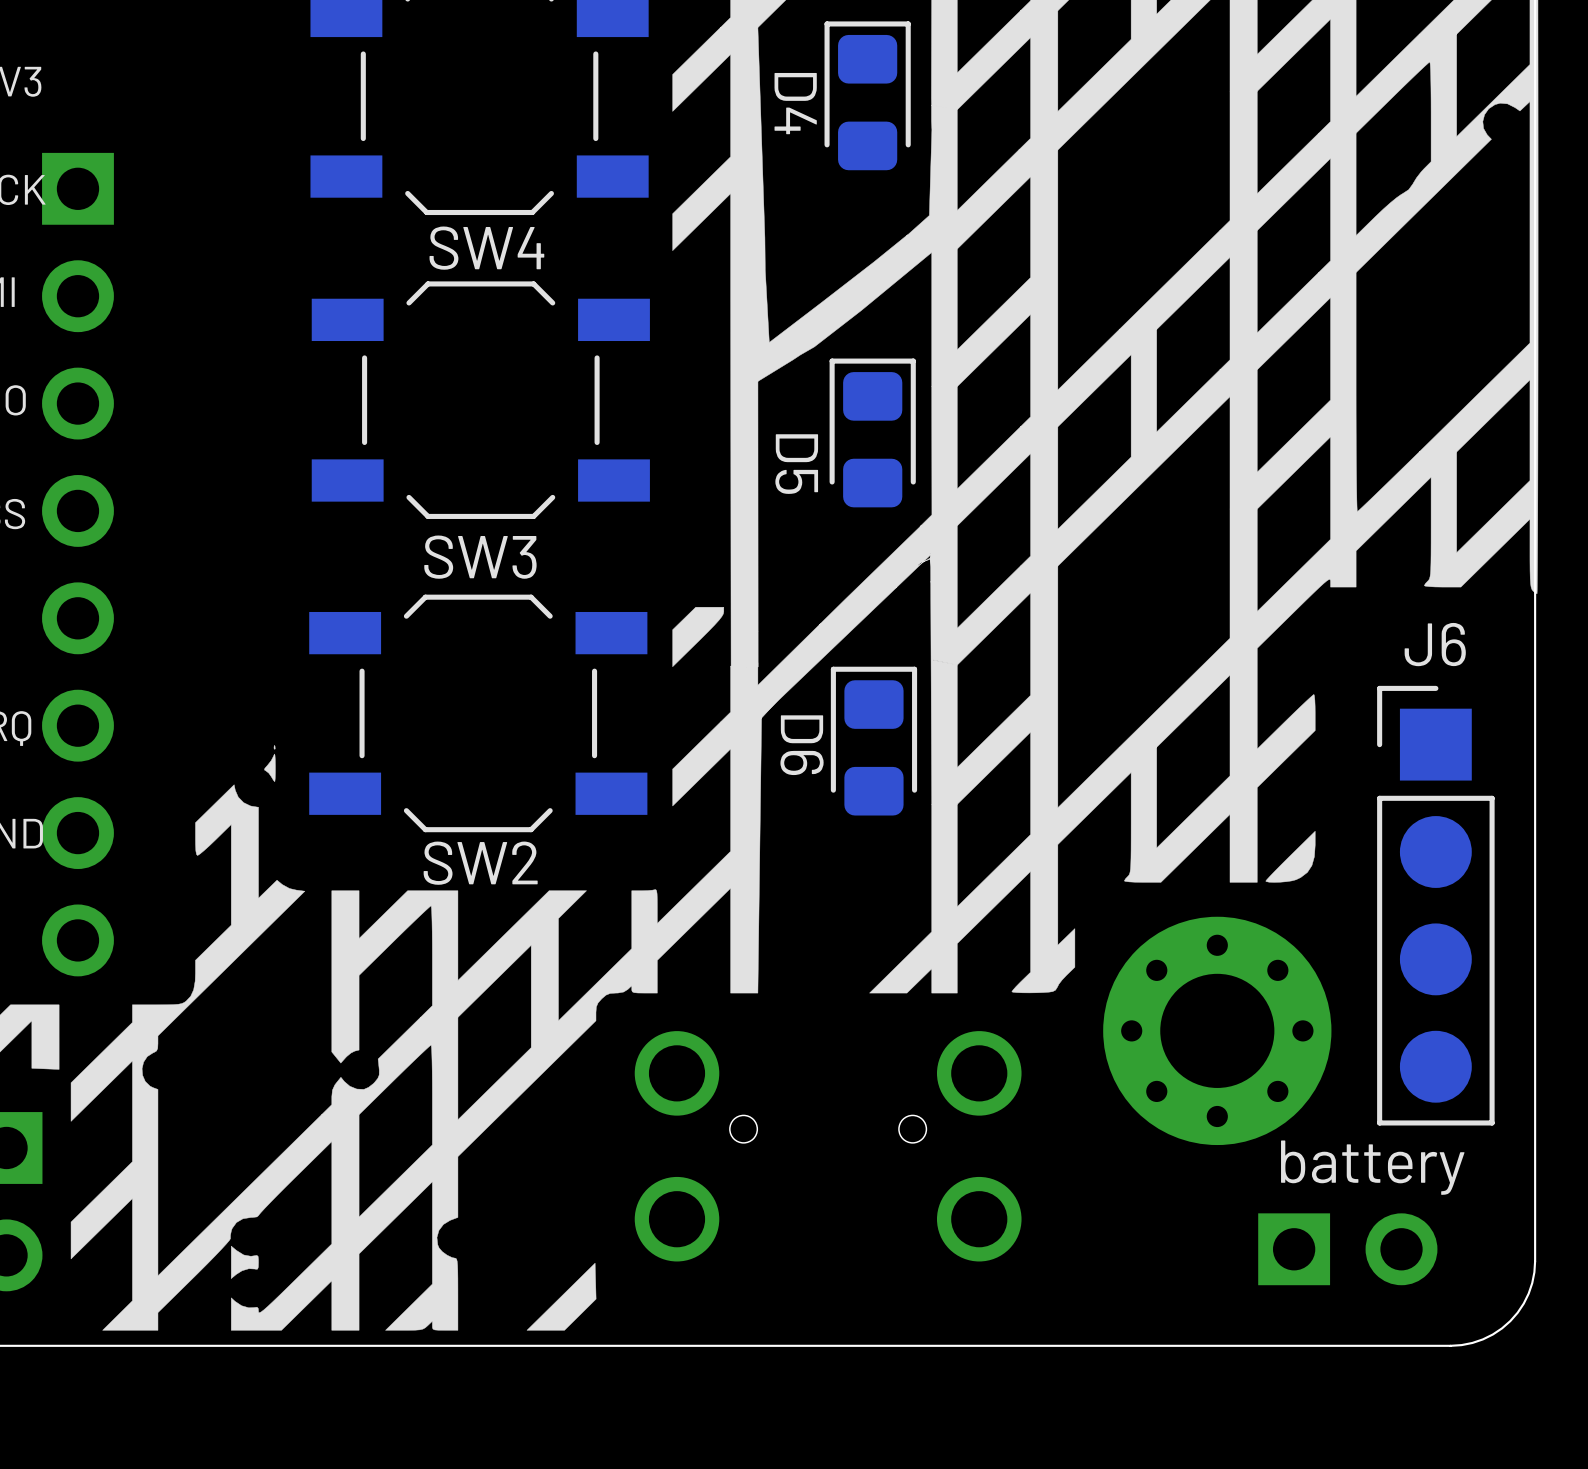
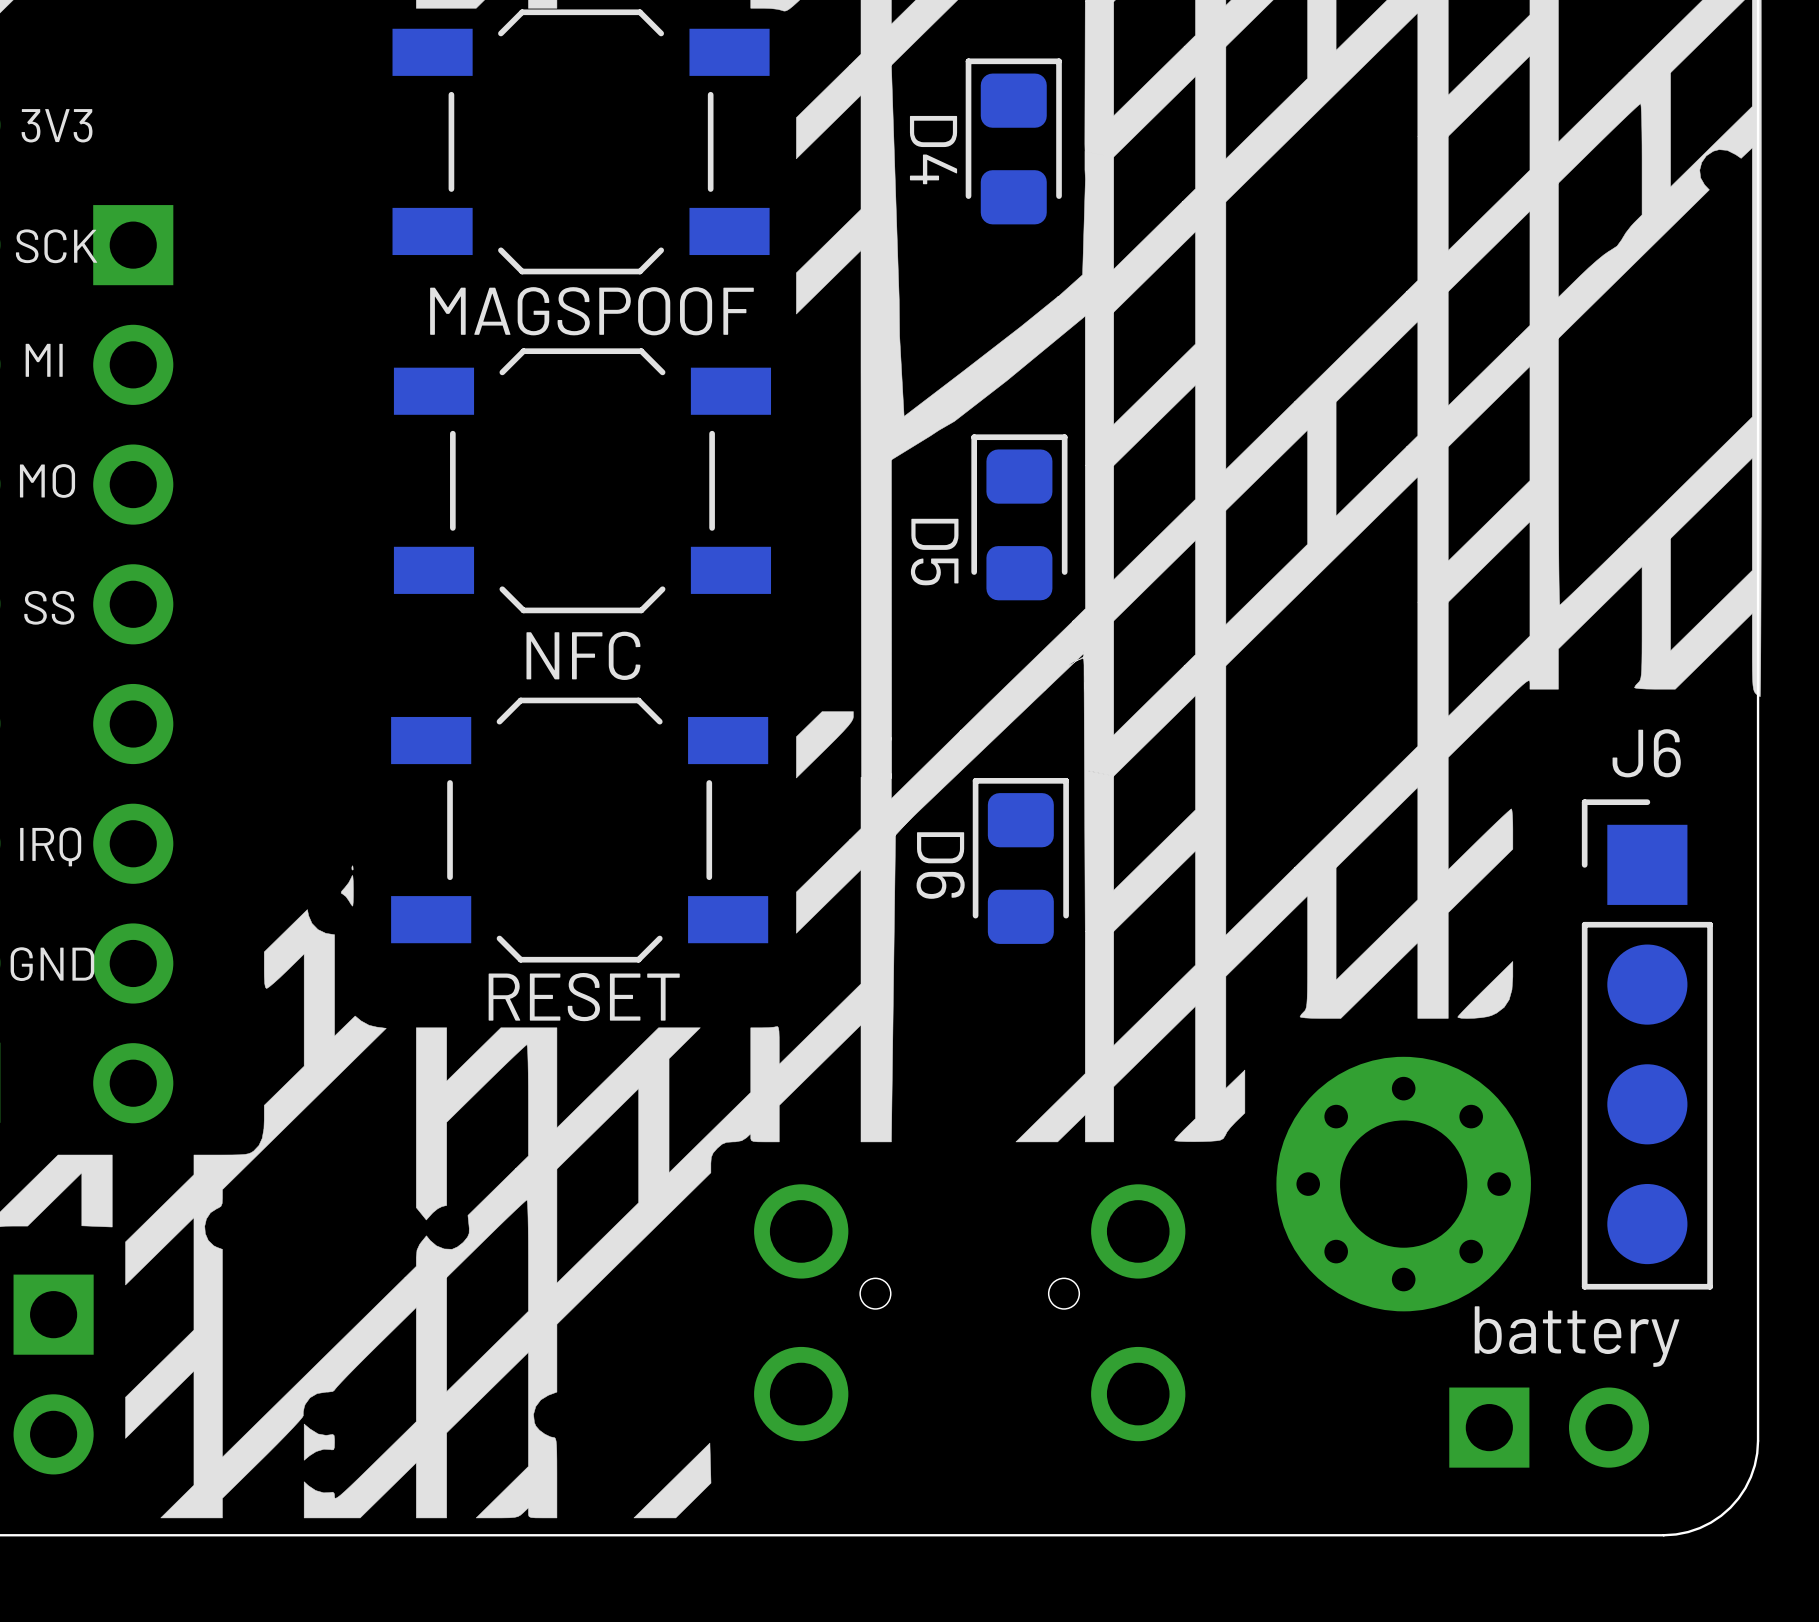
SW4 name: SW4 (486, 248) -> MAGSPOOF (591, 311)
SW3 name: SW3 (480, 557) -> NFC (583, 655)
SW2 name: SW2 (480, 863) -> RESET (584, 997)

